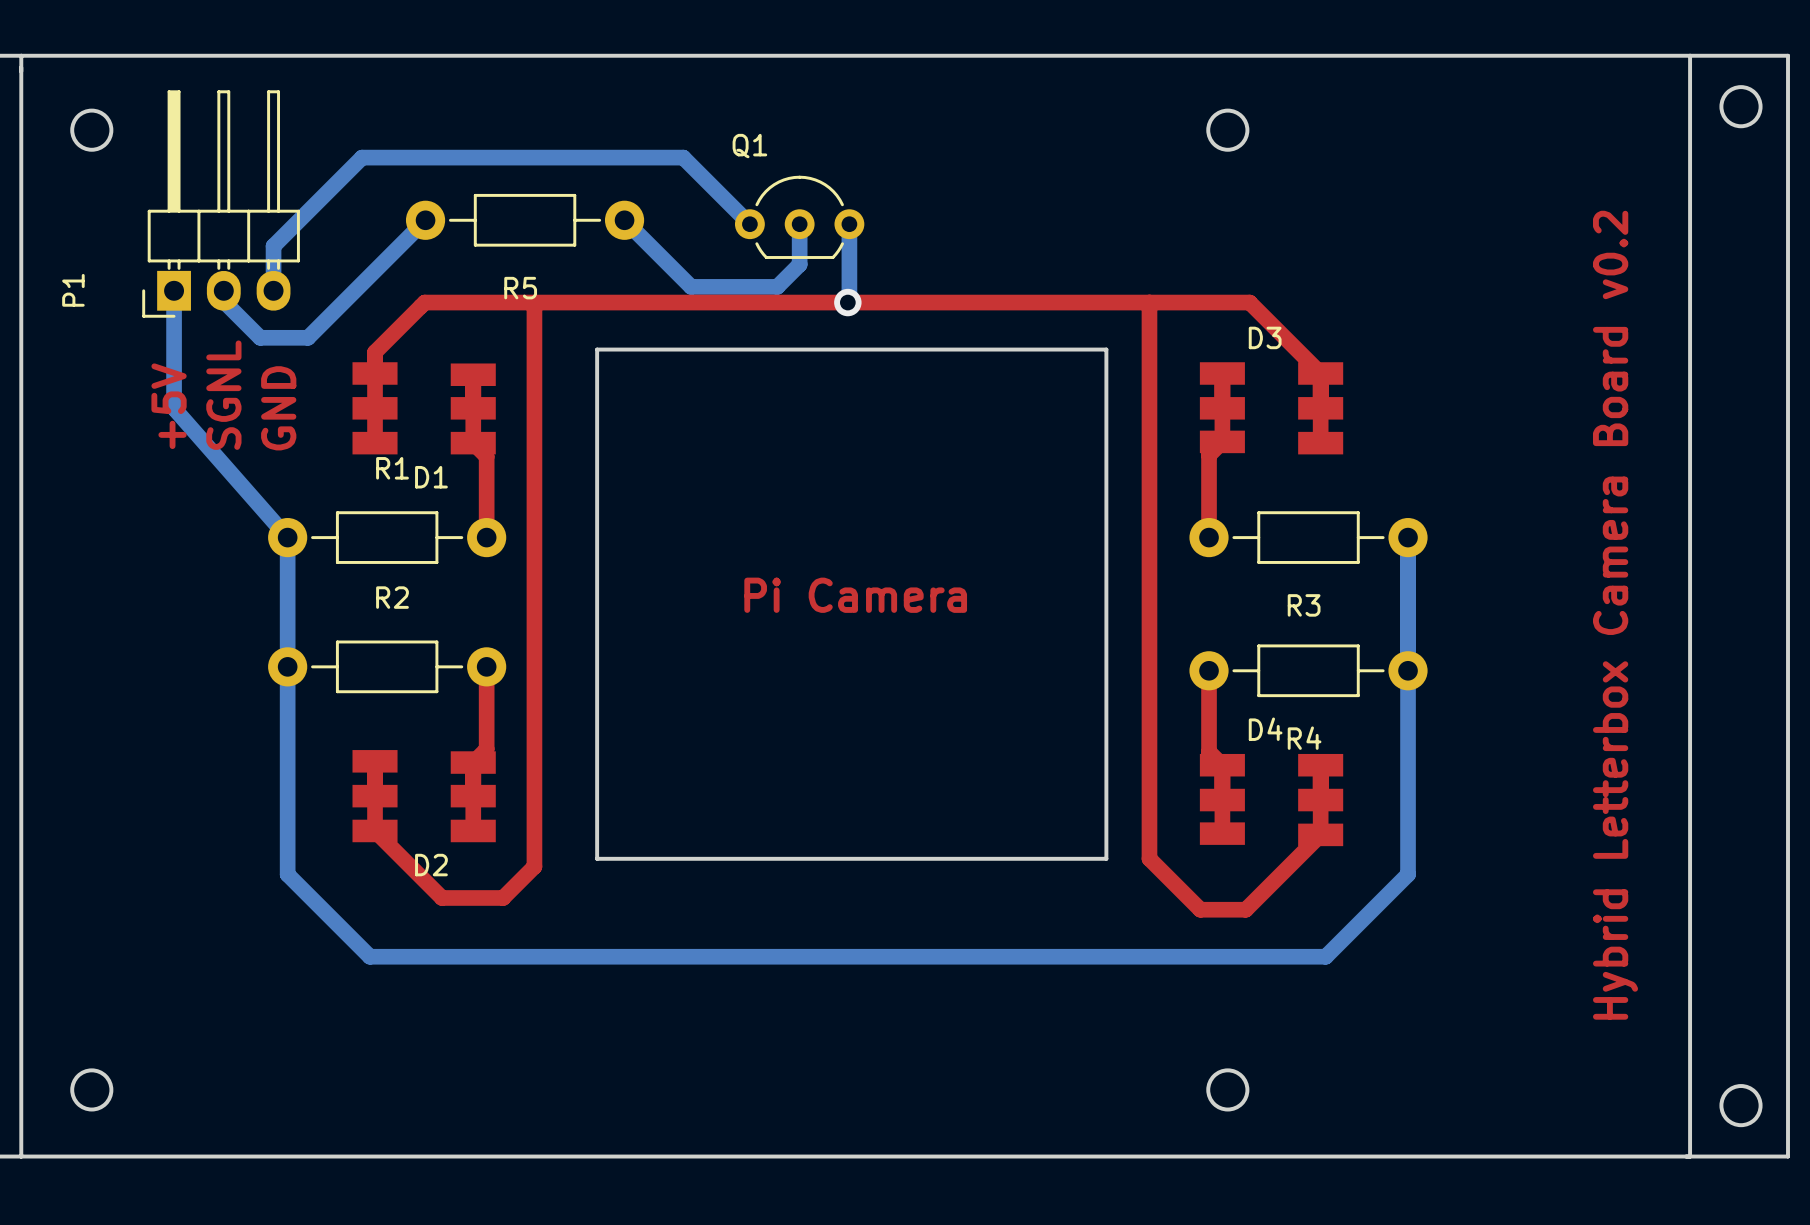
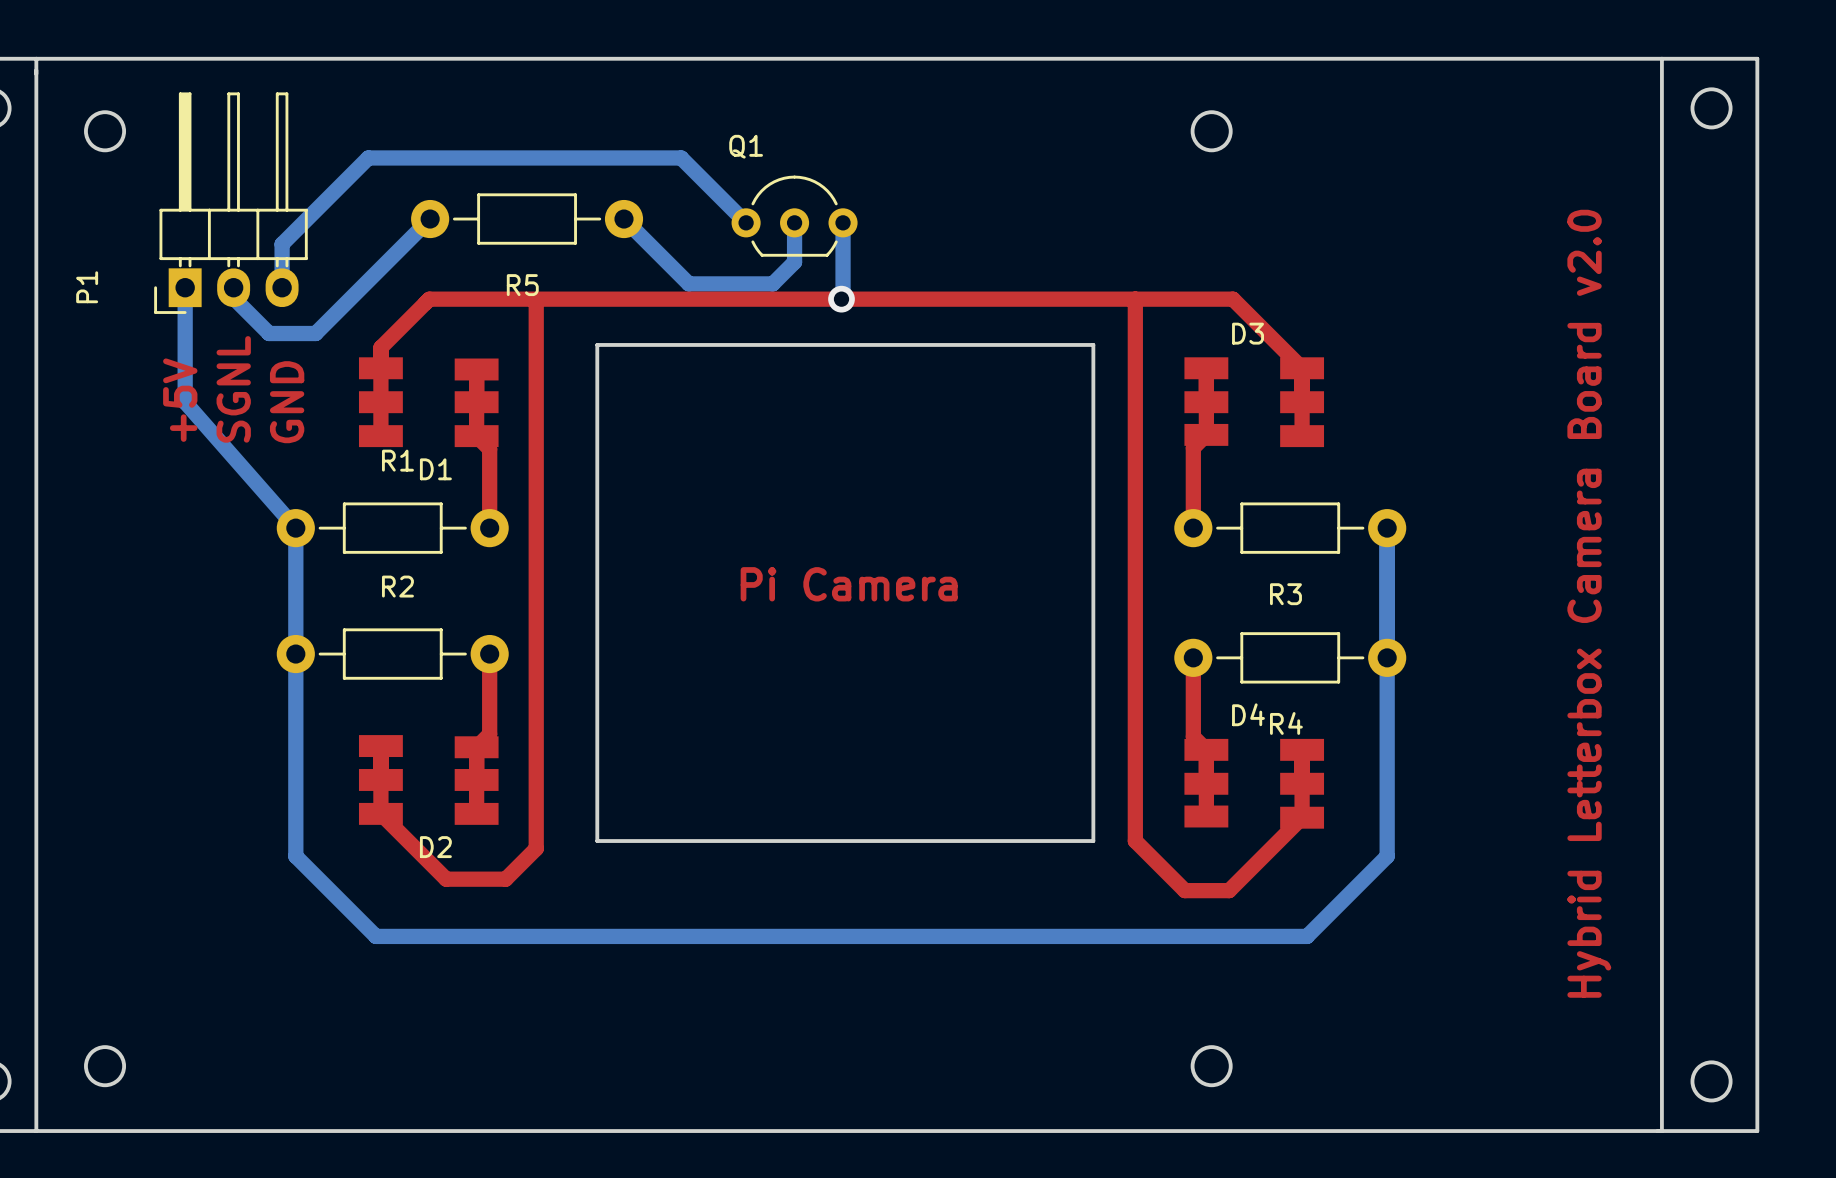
text: Hybrid Letterbox Camera Board v0.2 (1615, 615) -> Hybrid Letterbox Camera Board v2.0 (1589, 603)

